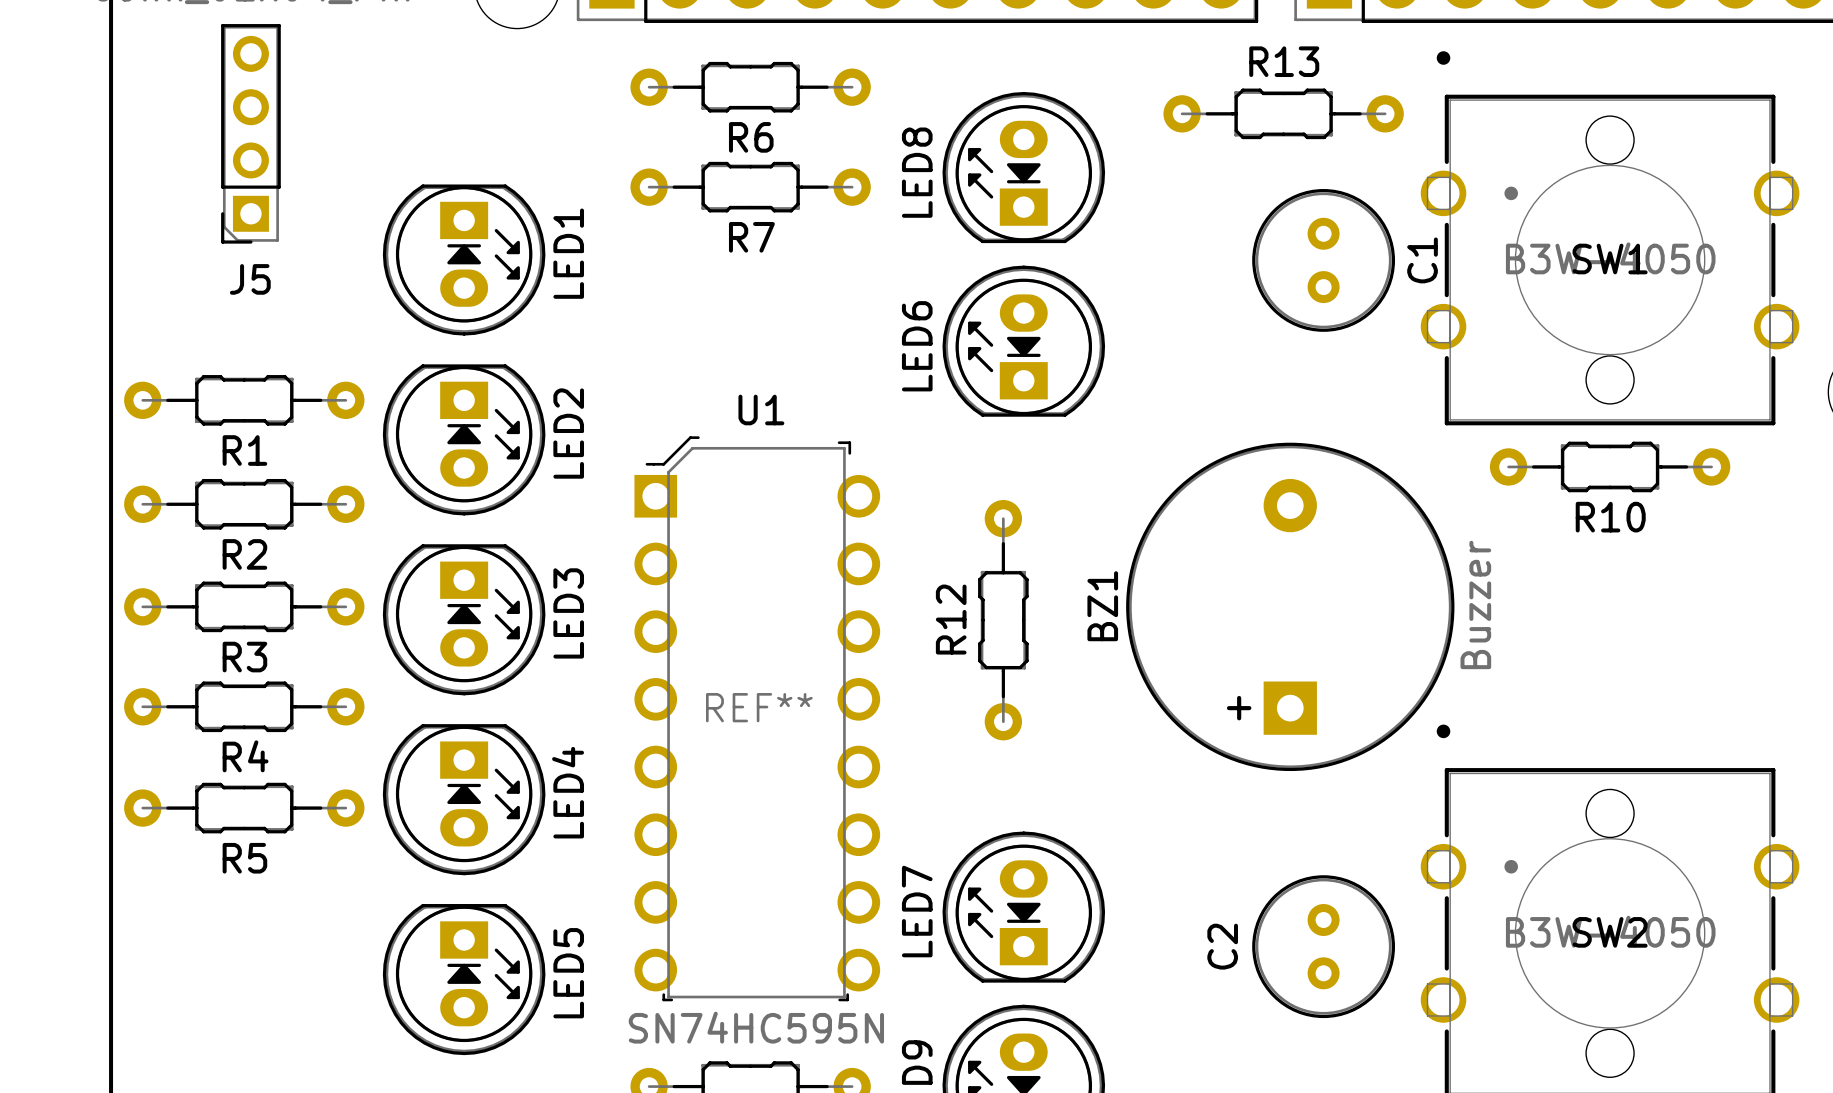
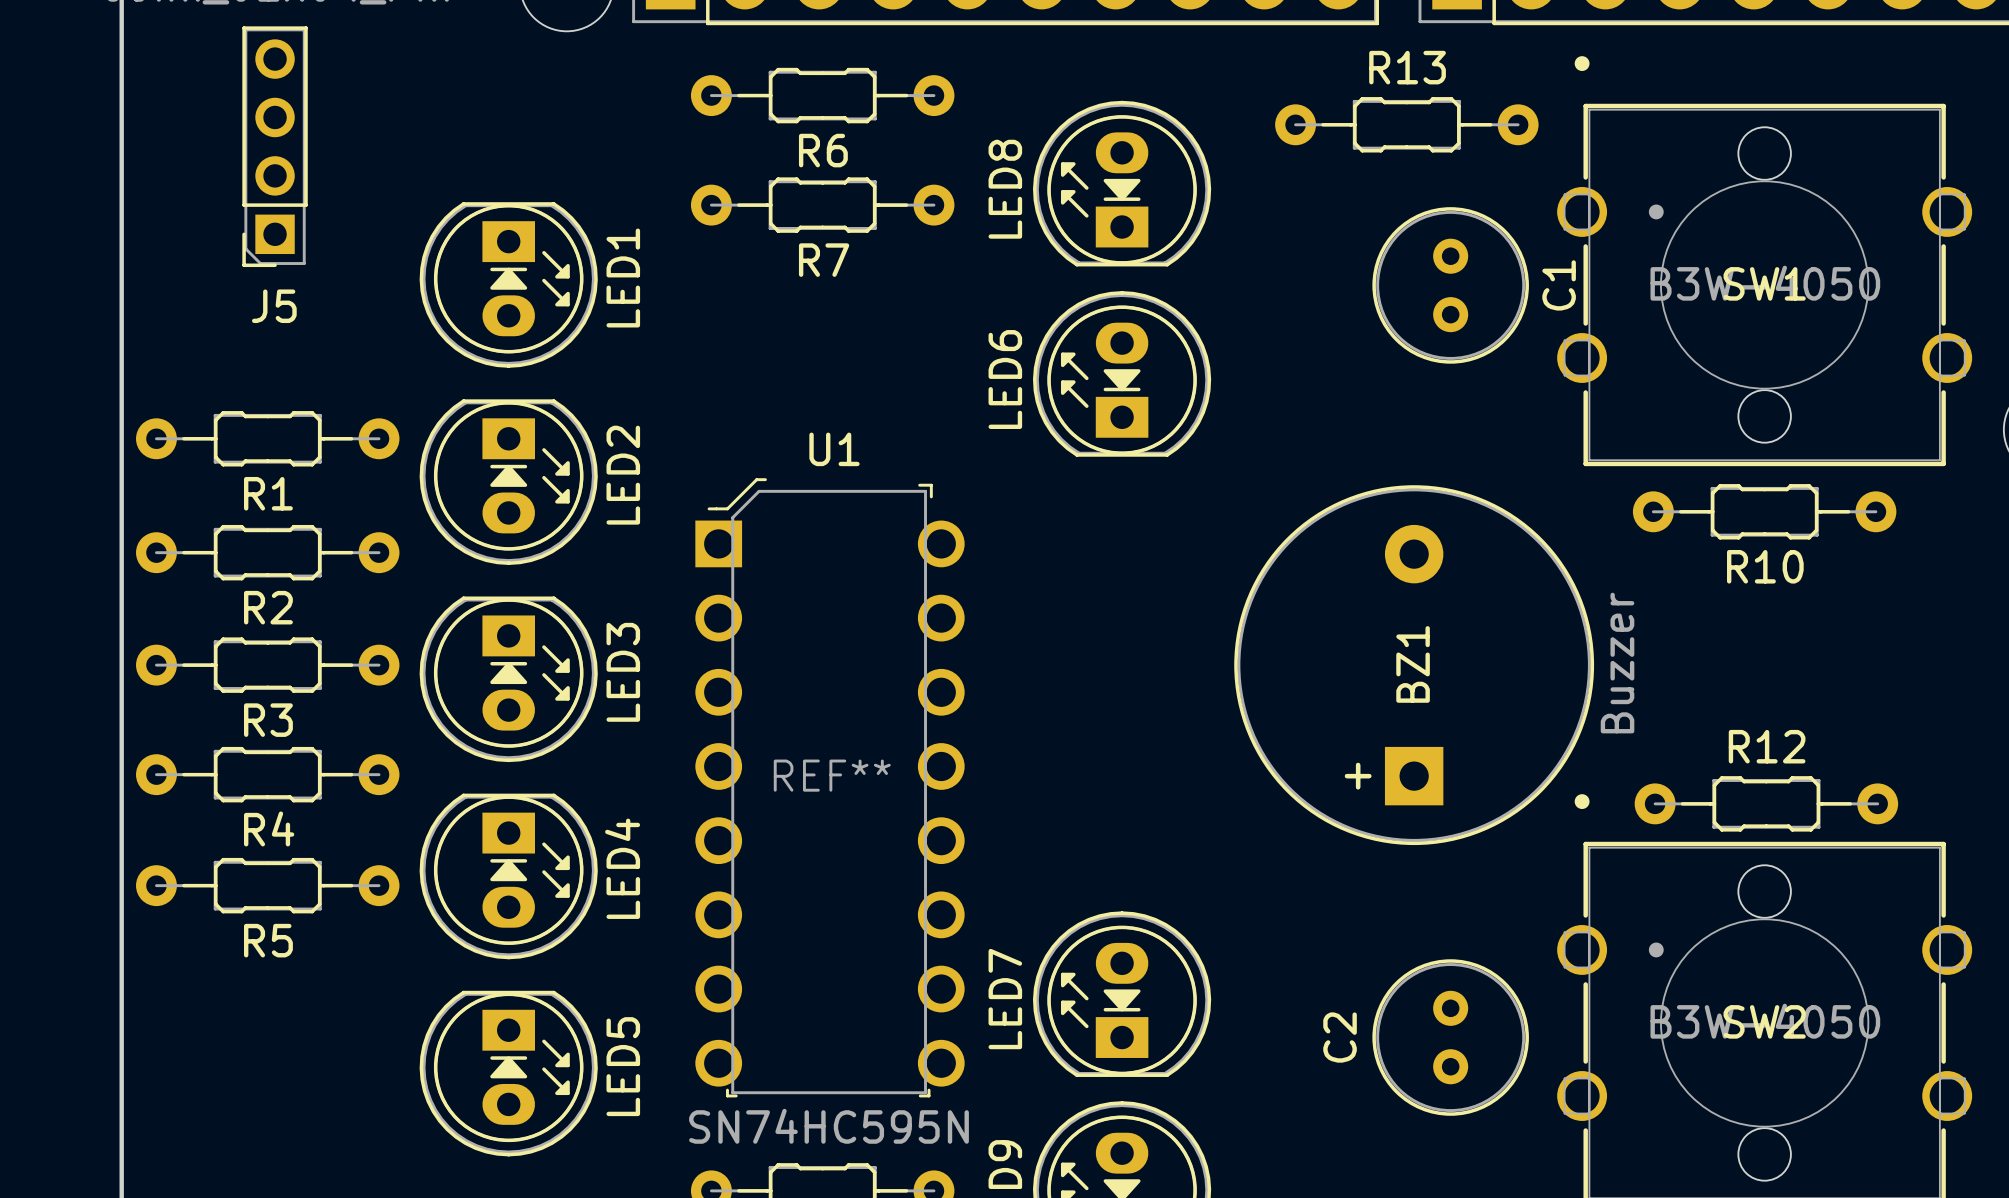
BZ1 name position: BZ1 (1102, 606) -> BZ1 (1413, 664)
R12 rotation: 0° (1003, 620) -> 90° clockwise (1766, 803)
R12 position: (1003, 620) -> (1766, 803)

